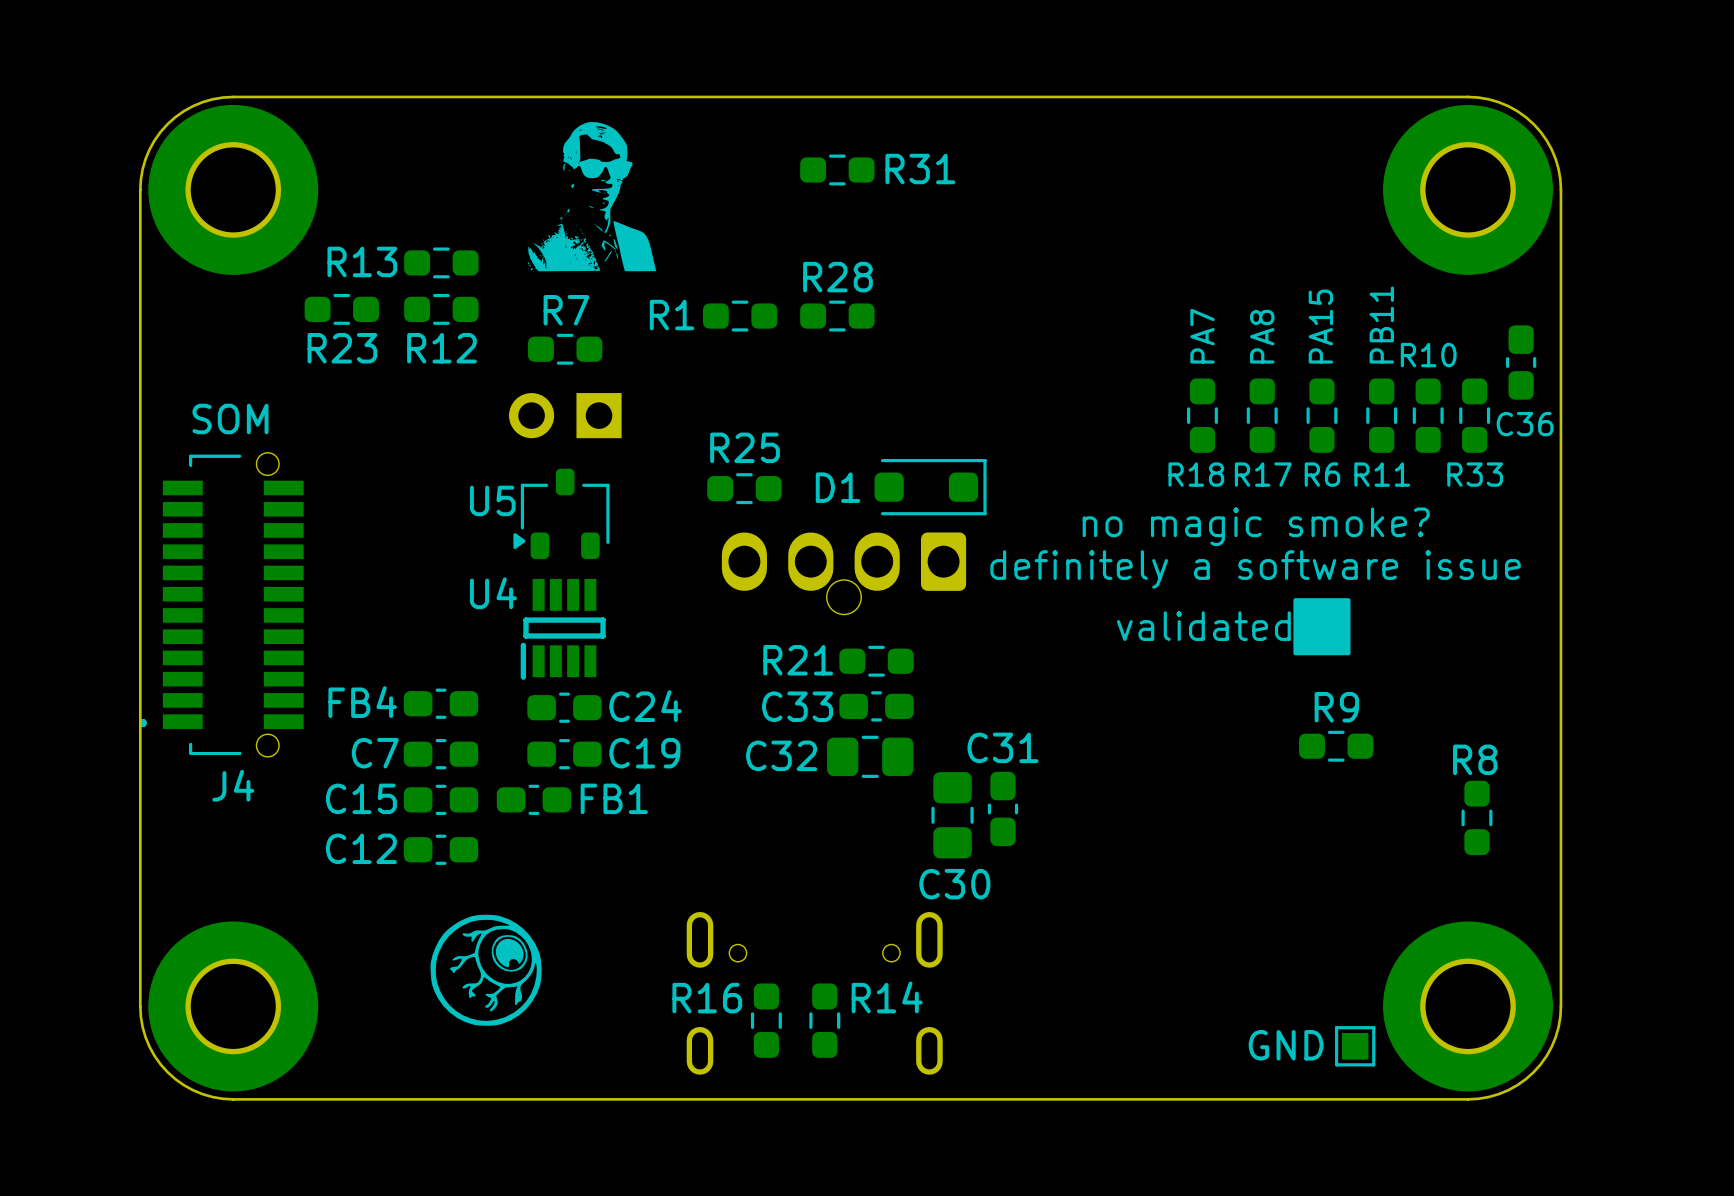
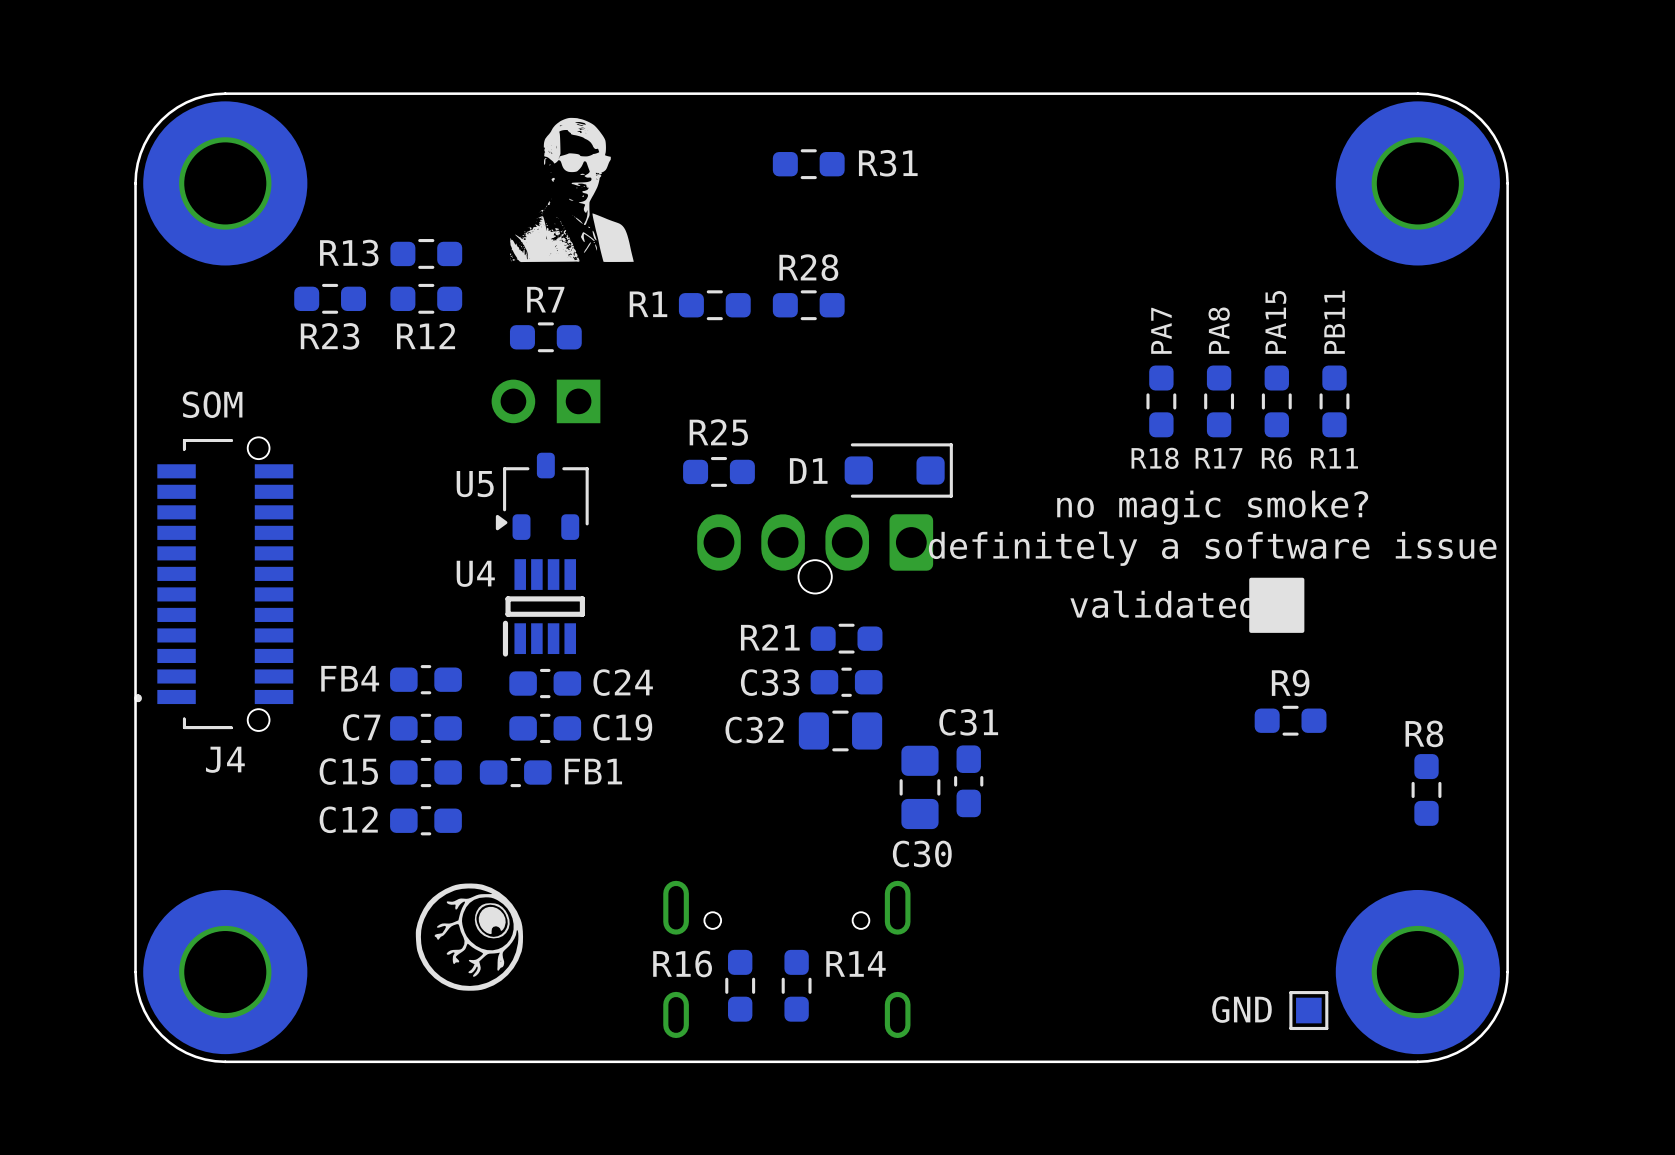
C36: (1521, 362) -> none
R10: (1428, 415) -> none
R33: (1474, 415) -> none

